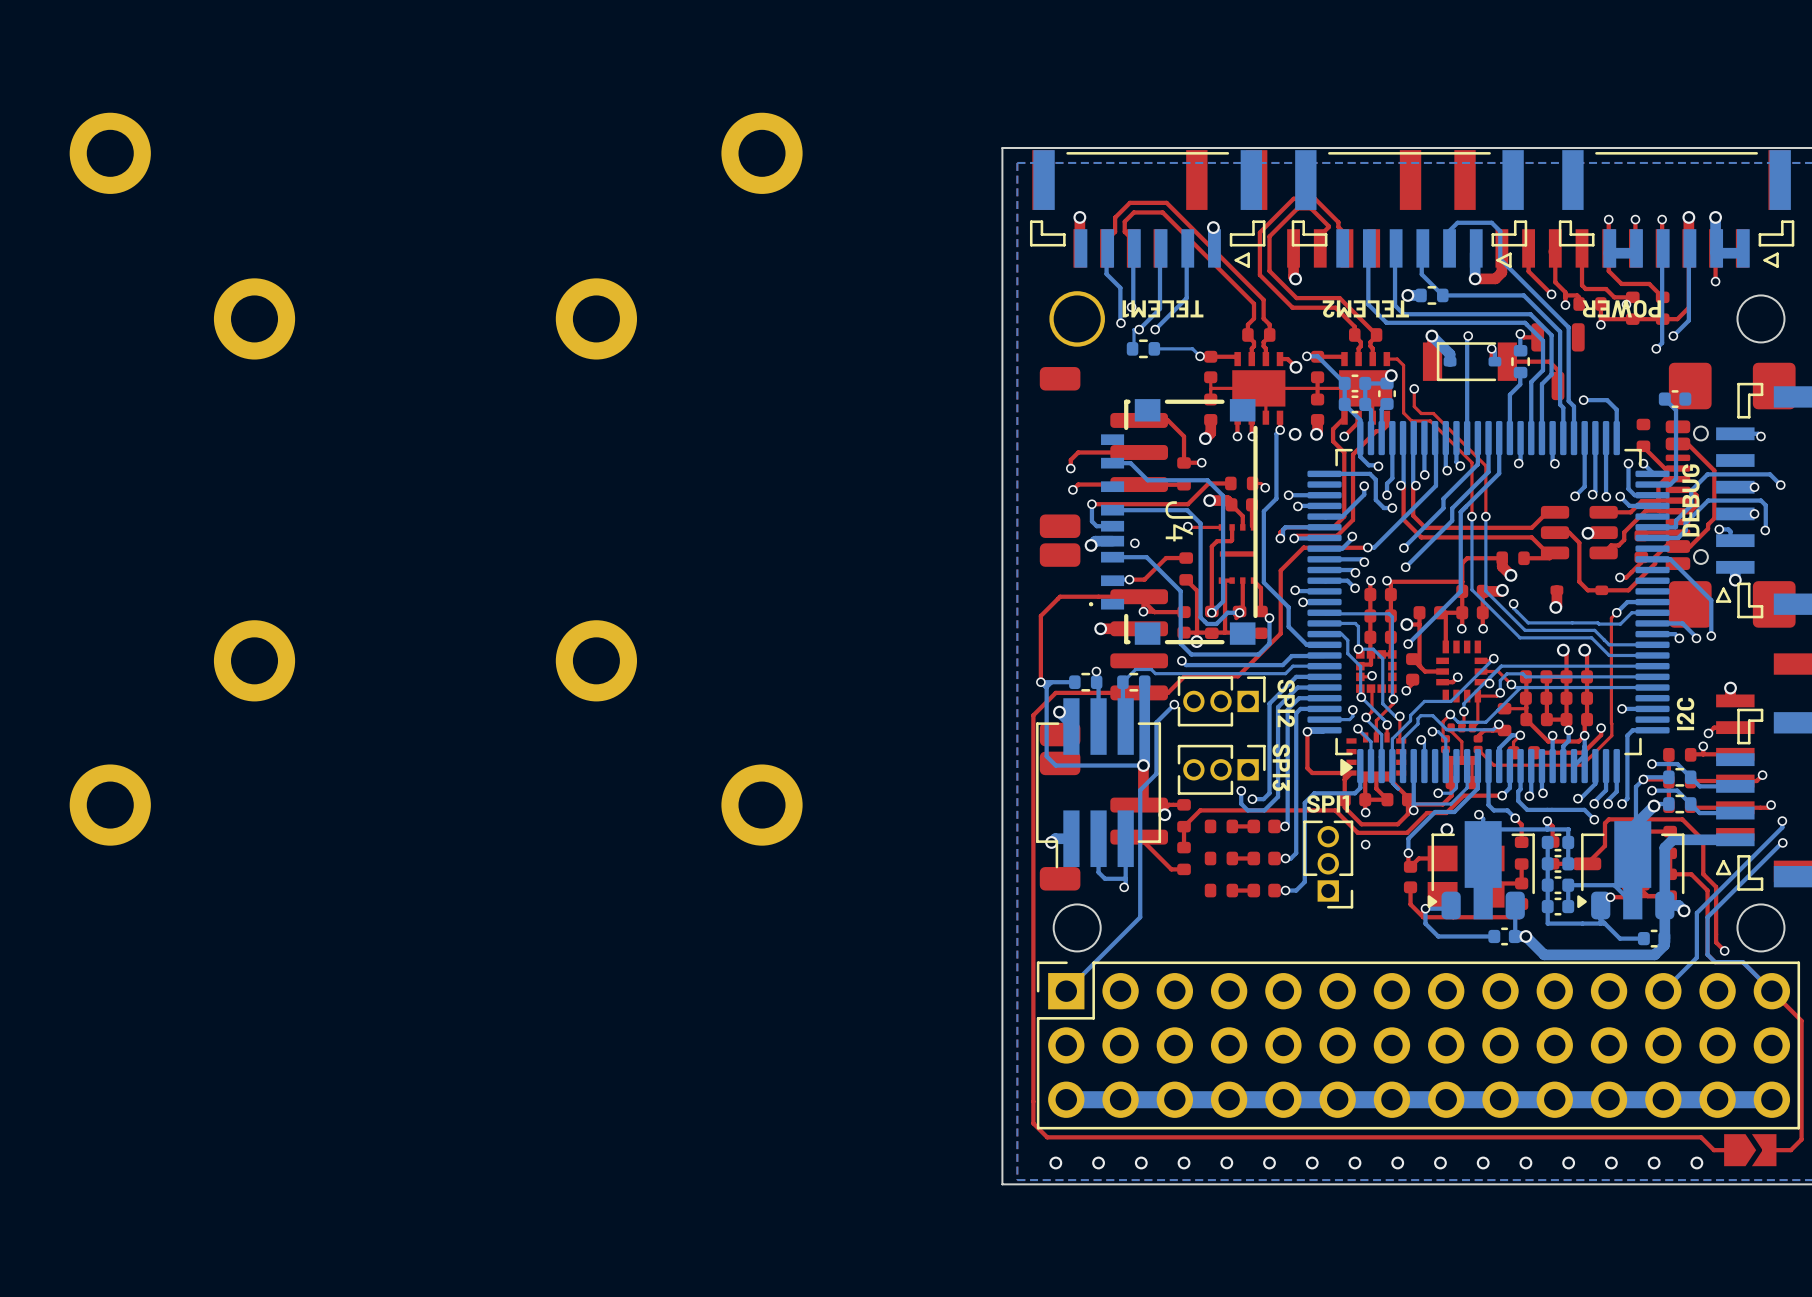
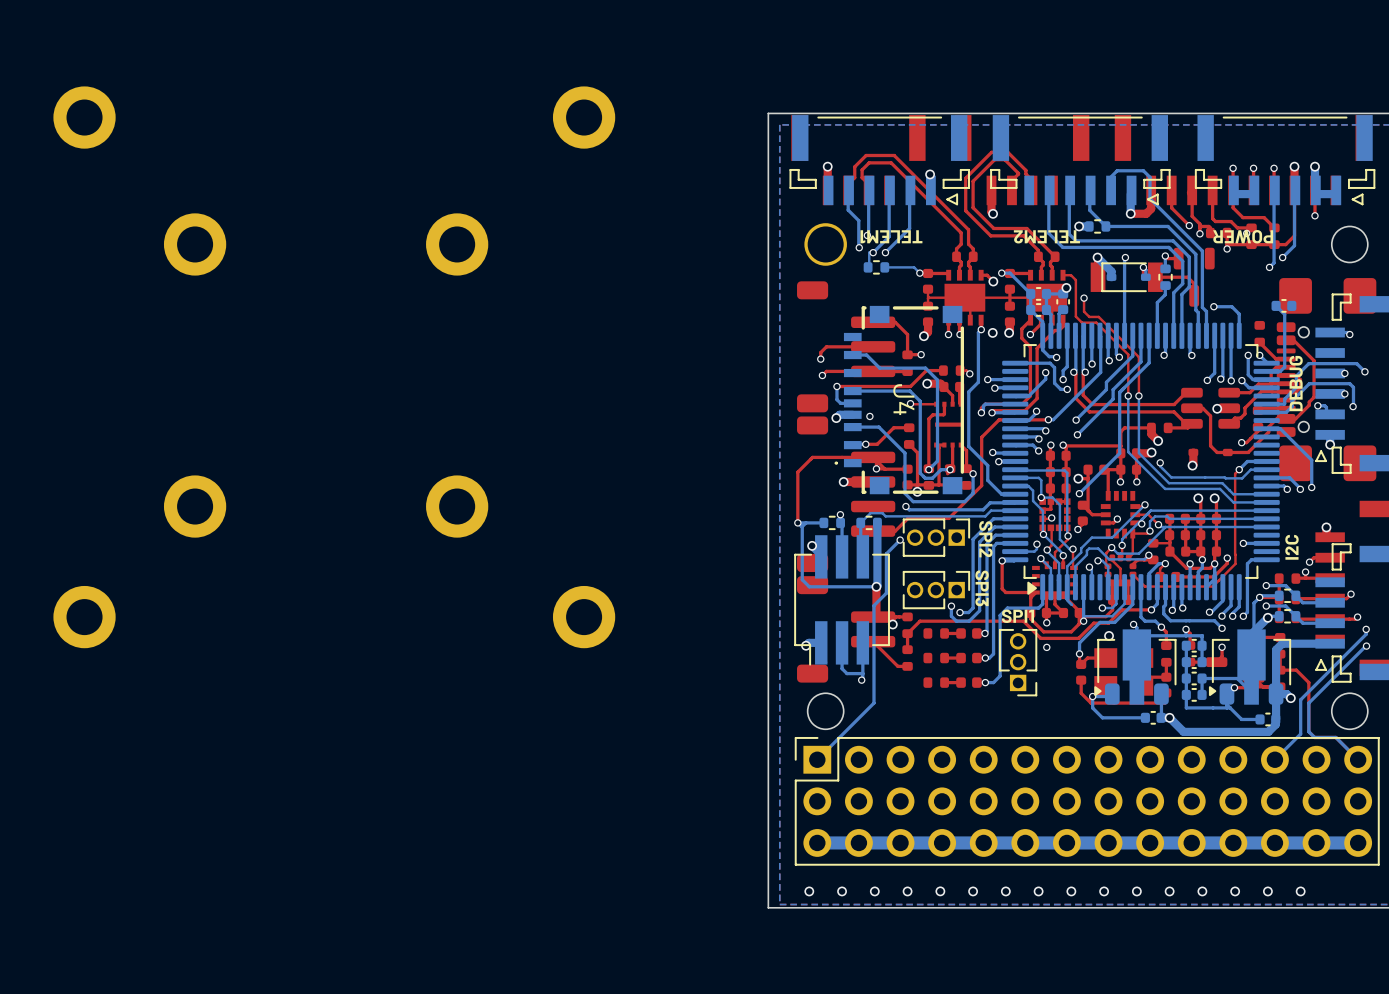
top track: (1139, 692) (1055, 692) (1033, 715) (1033, 1123) (1047, 1137) (1701, 1137) (1713, 1150) (1734, 1150) -> none
via: none -> (1222, 647)
top track: (1594, 856) (1604, 845) (1604, 823) (1608, 819) (1682, 819) (1703, 840) (1703, 874) (1716, 887) (1716, 942) (1724, 950) -> (1222, 656) (1222, 647)
via: (1724, 950) -> none
top track: (1771, 991) (1801, 1020) (1801, 1139) (1790, 1150) (1765, 1150) -> none
part: (1750, 1150) -> none

